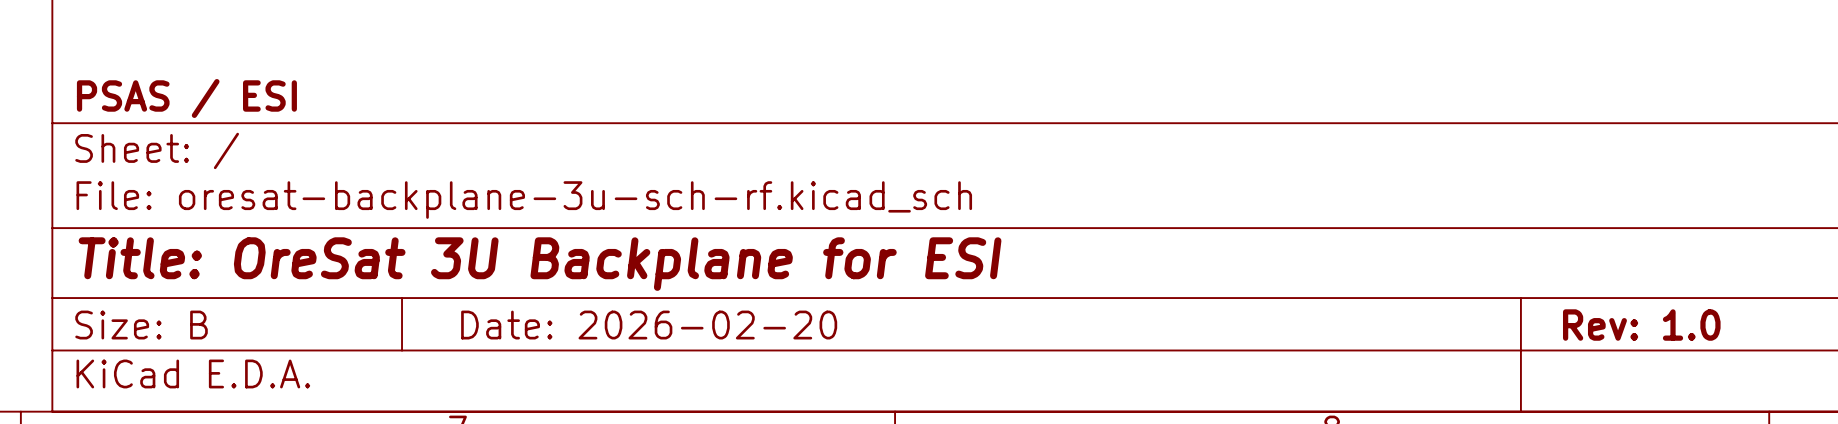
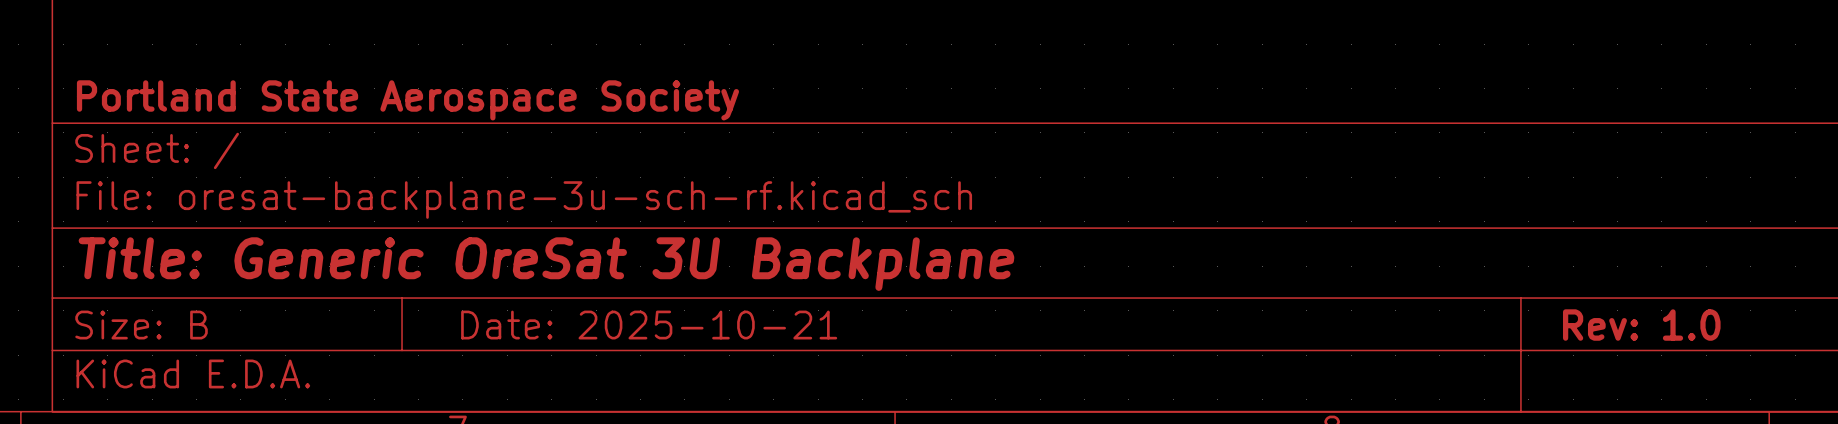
title block: PSAS / ESI (186, 98) -> Portland State Aerospace Society (407, 100)
title block: Title: OreSat 3U Backplane for ESI (540, 264) -> Title: Generic OreSat 3U Backplane (546, 264)
title block: Date: 2026-02-20 (649, 325) -> Date: 2025-10-21 (649, 325)

